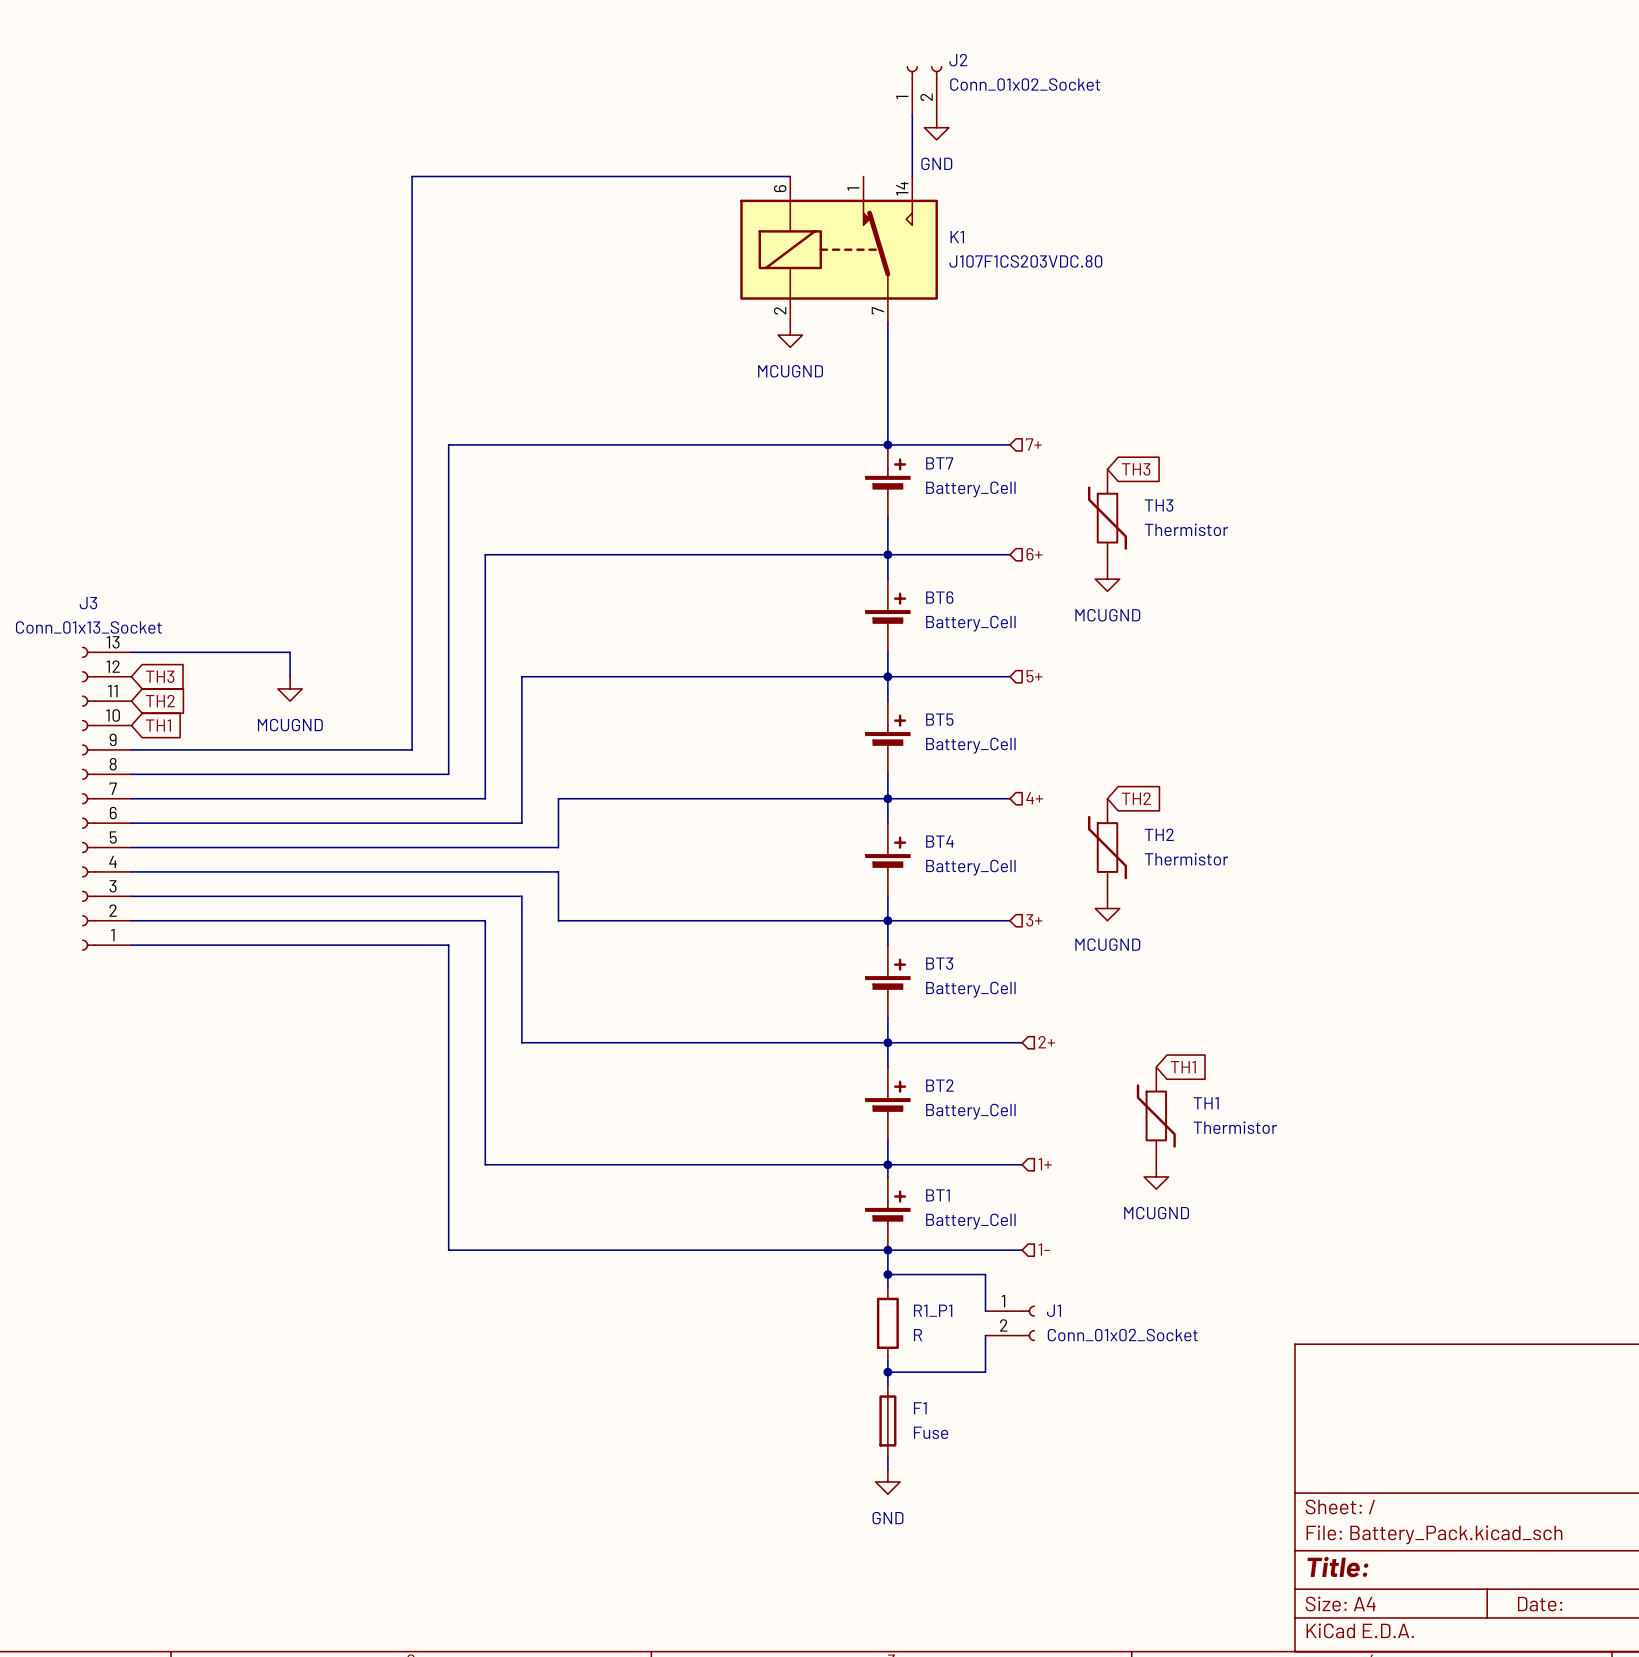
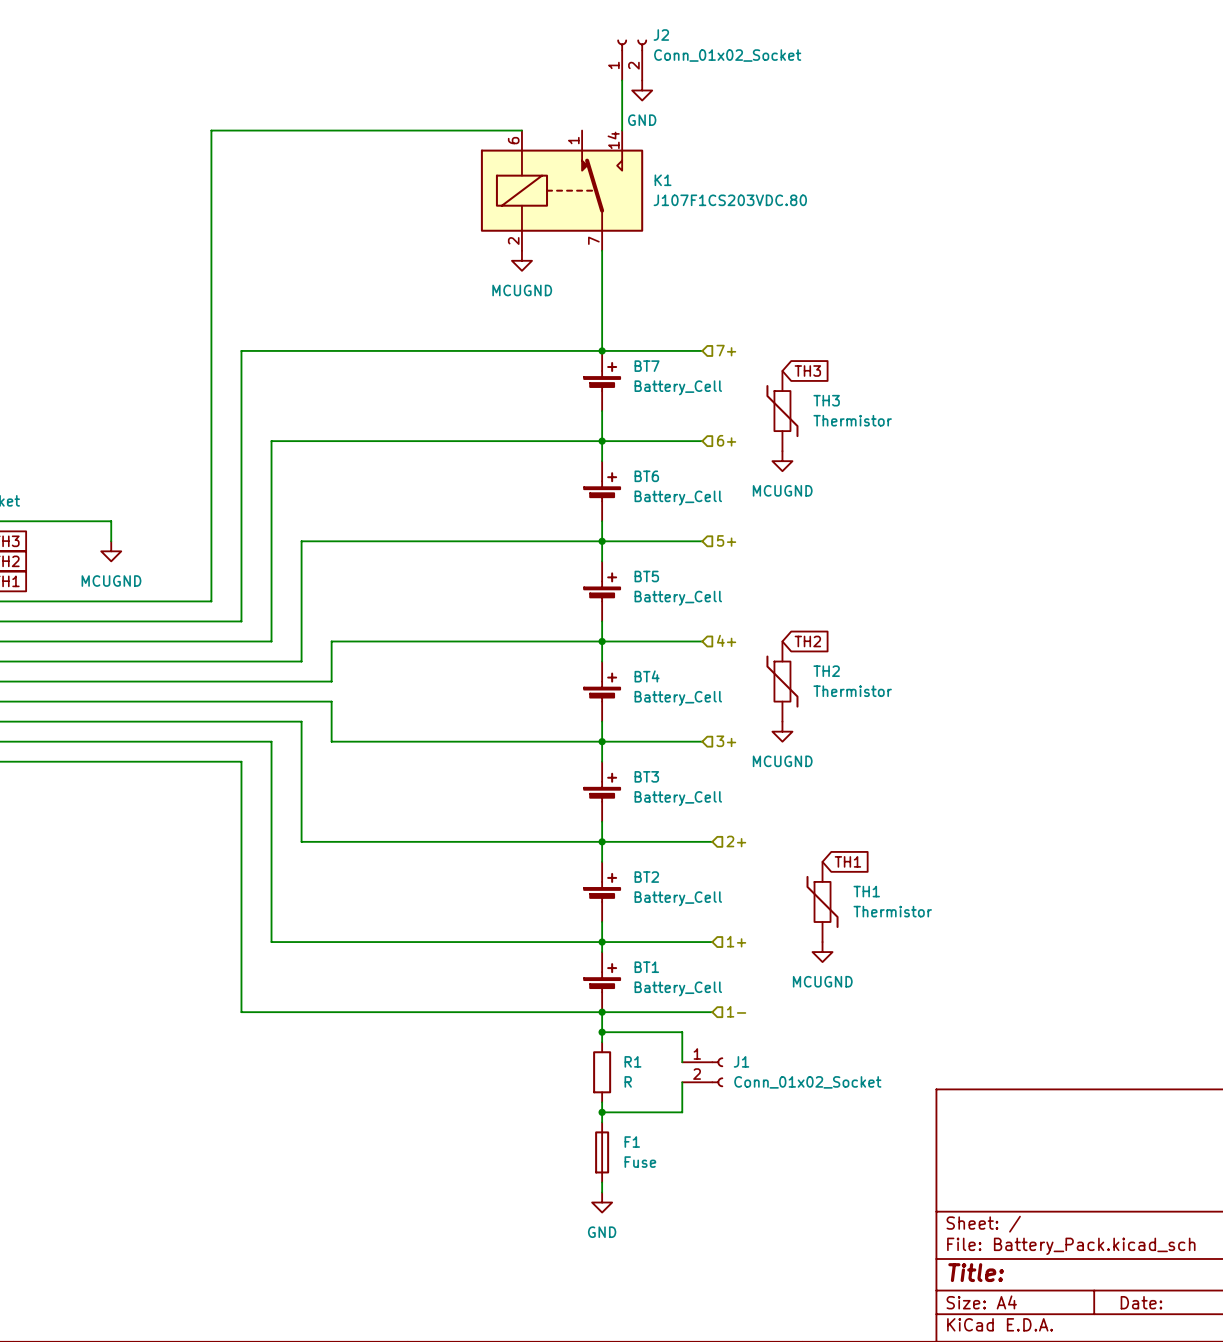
R1_P1 name: R1_P1 (933, 1310) -> R1 (632, 1061)

